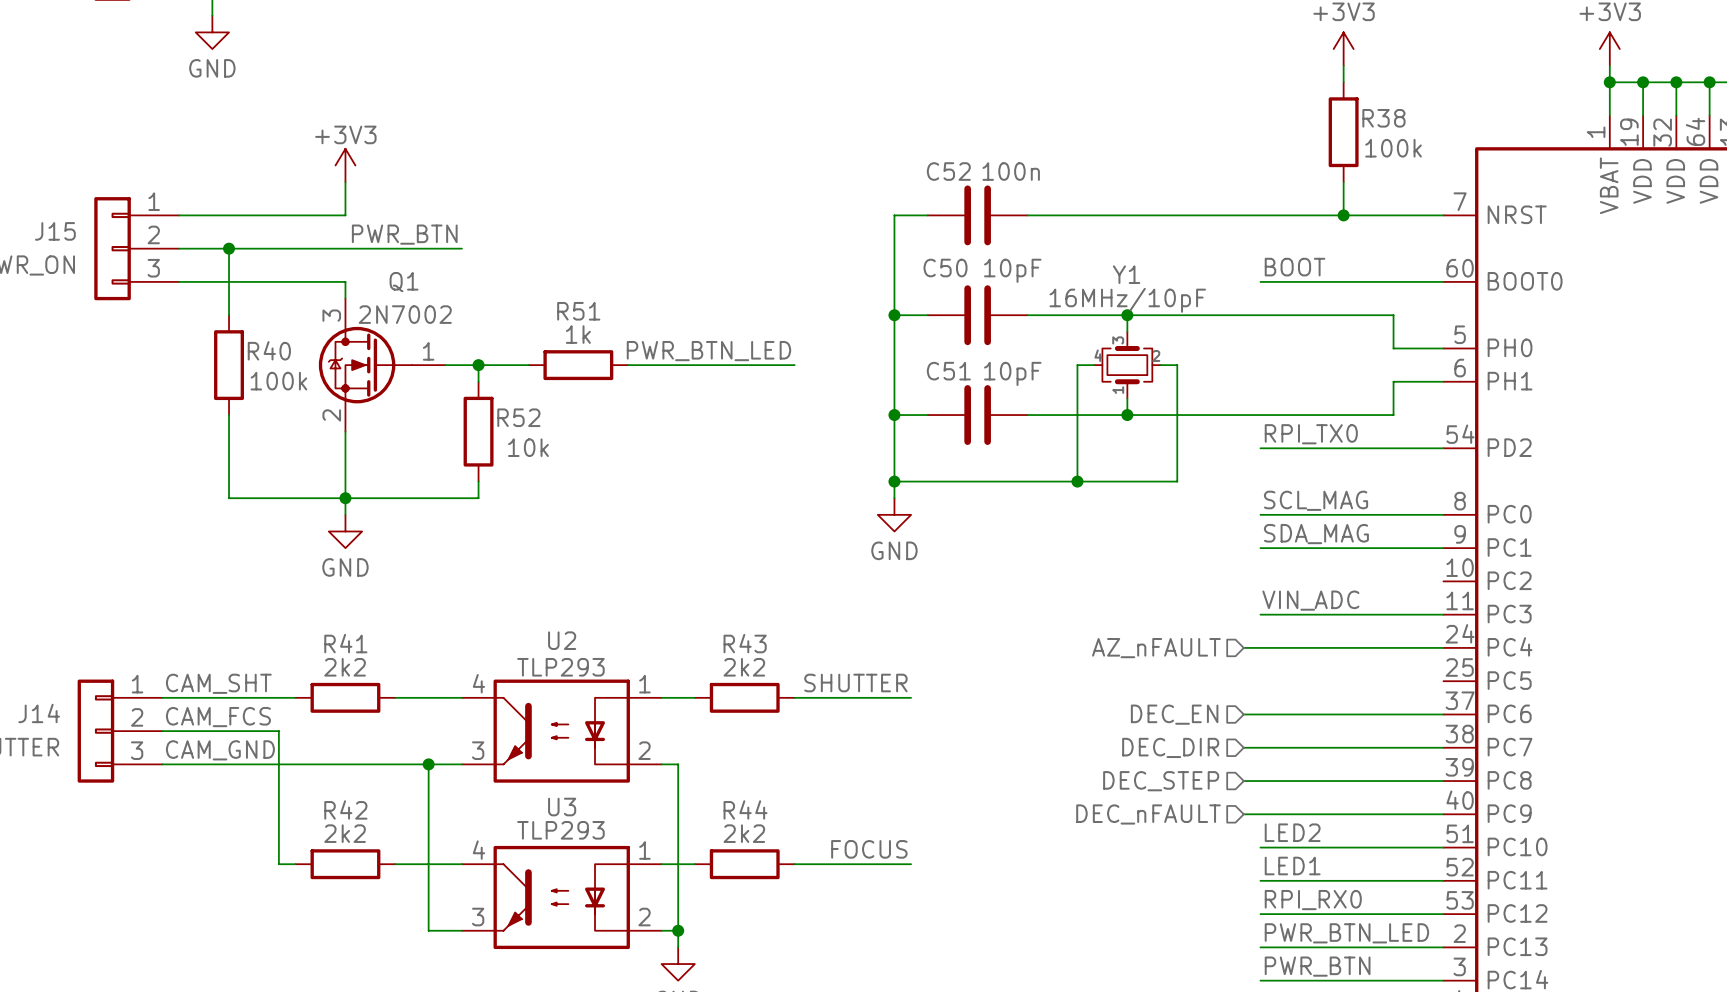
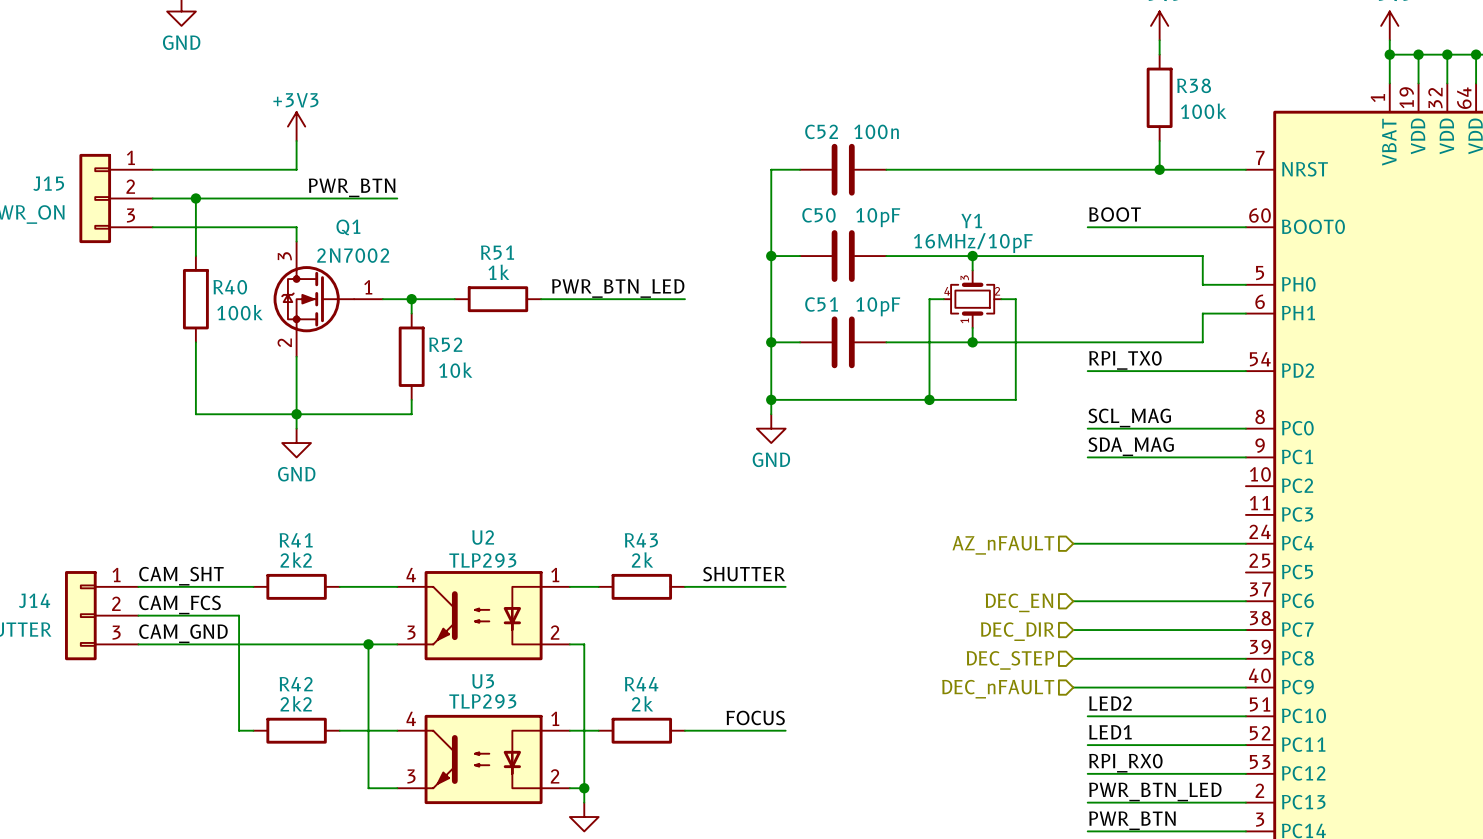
label: VIN_ADC (1310, 600) -> none
wire: (1260, 614) (1443, 614) -> none
R43 value: 2k2 (744, 667) -> 2k (642, 559)
R44 value: 2k2 (744, 833) -> 2k (642, 703)

